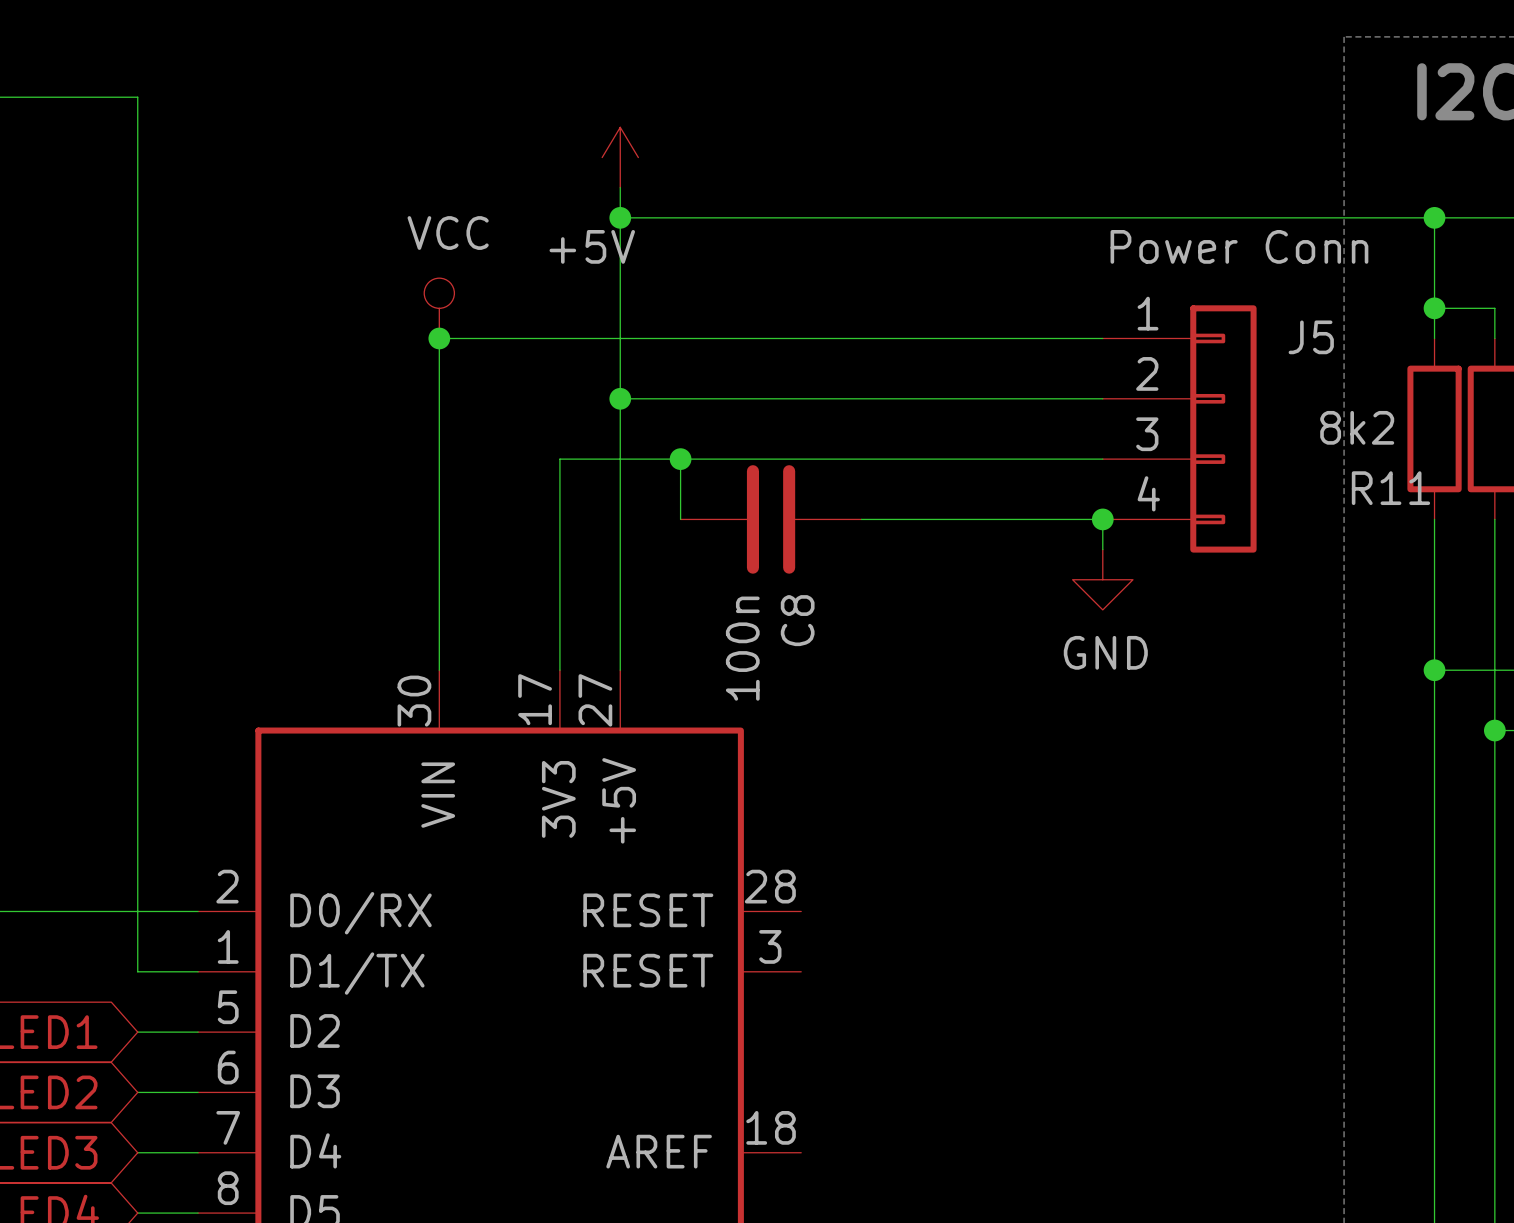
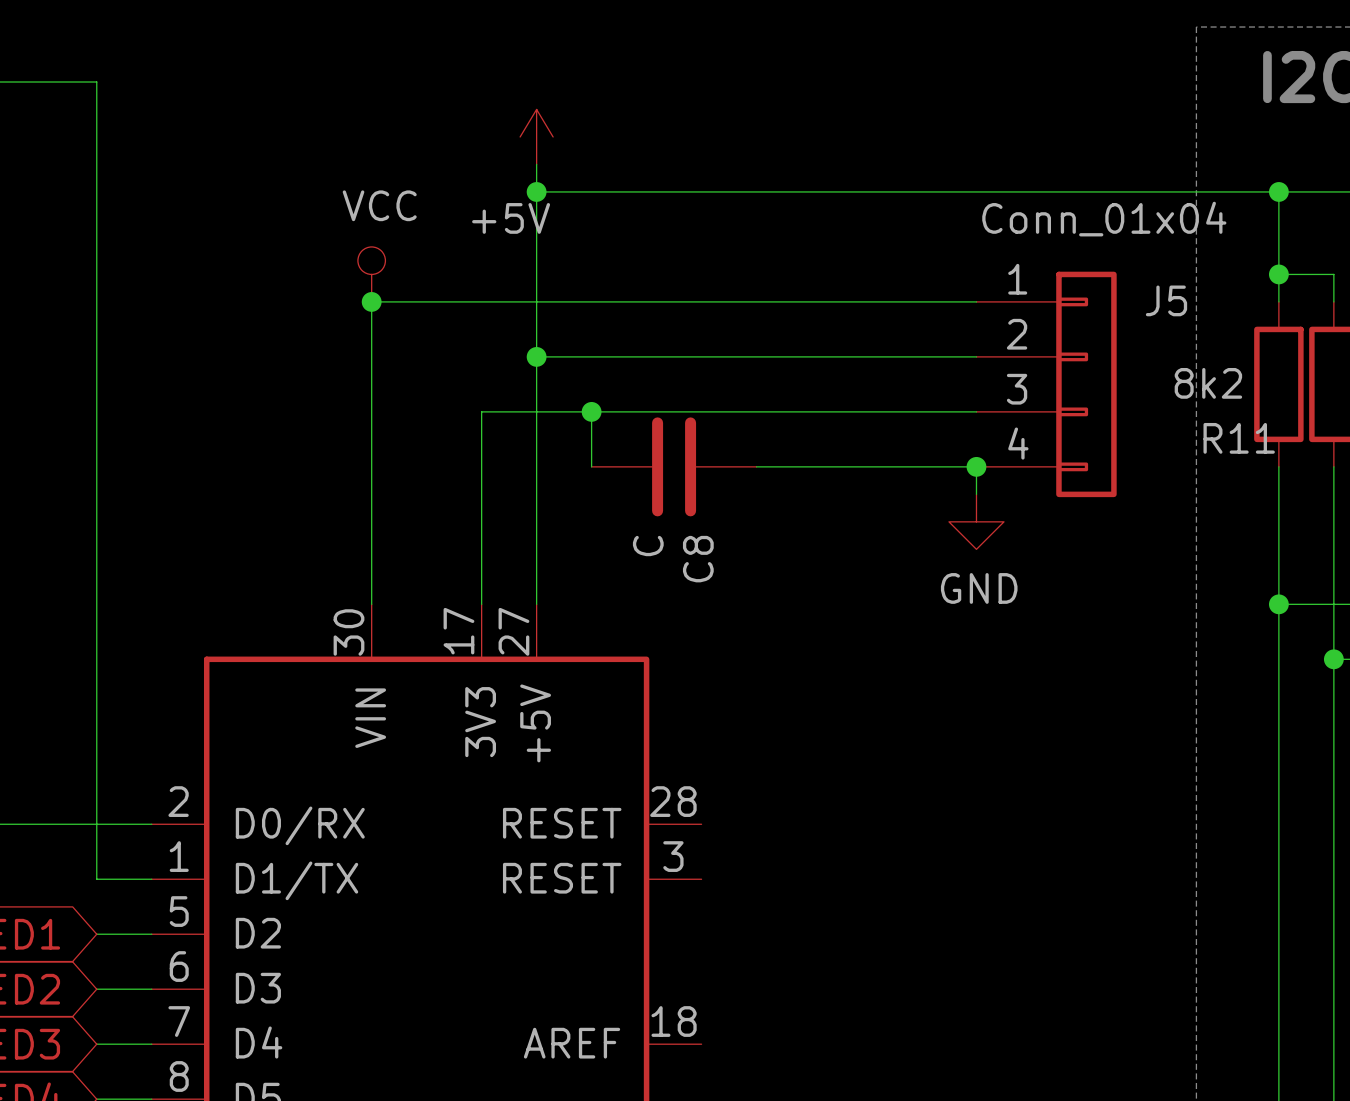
J5 value: Power Conn (1239, 246) -> Conn_01x04 (1104, 219)
C8 value: 100n (742, 648) -> C (648, 546)

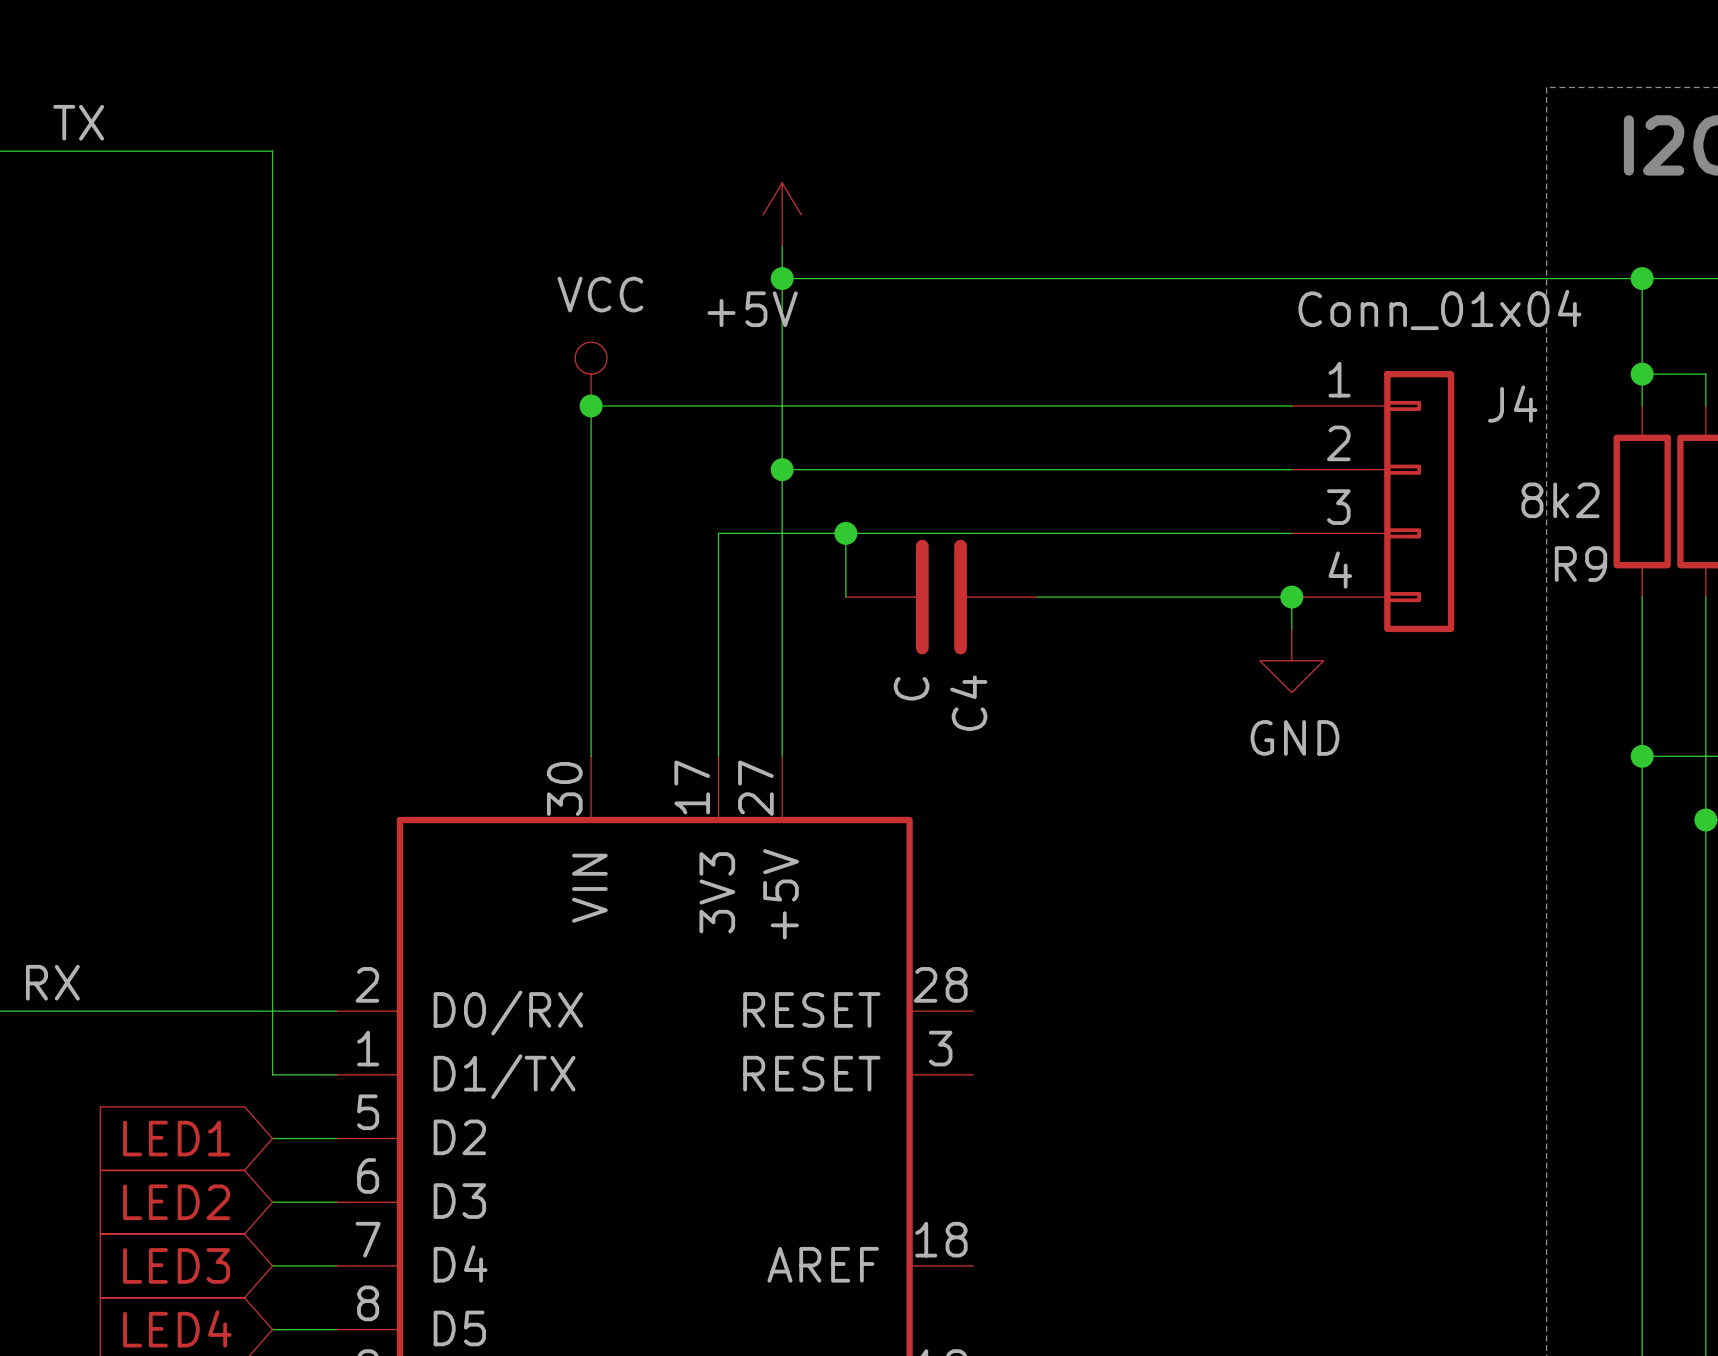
J5 name: J5 (1166, 300) -> J4 (1512, 404)
R11 name: R11 (1239, 438) -> R9 (1580, 564)
C8 name: C8 (698, 559) -> C4 (968, 703)

